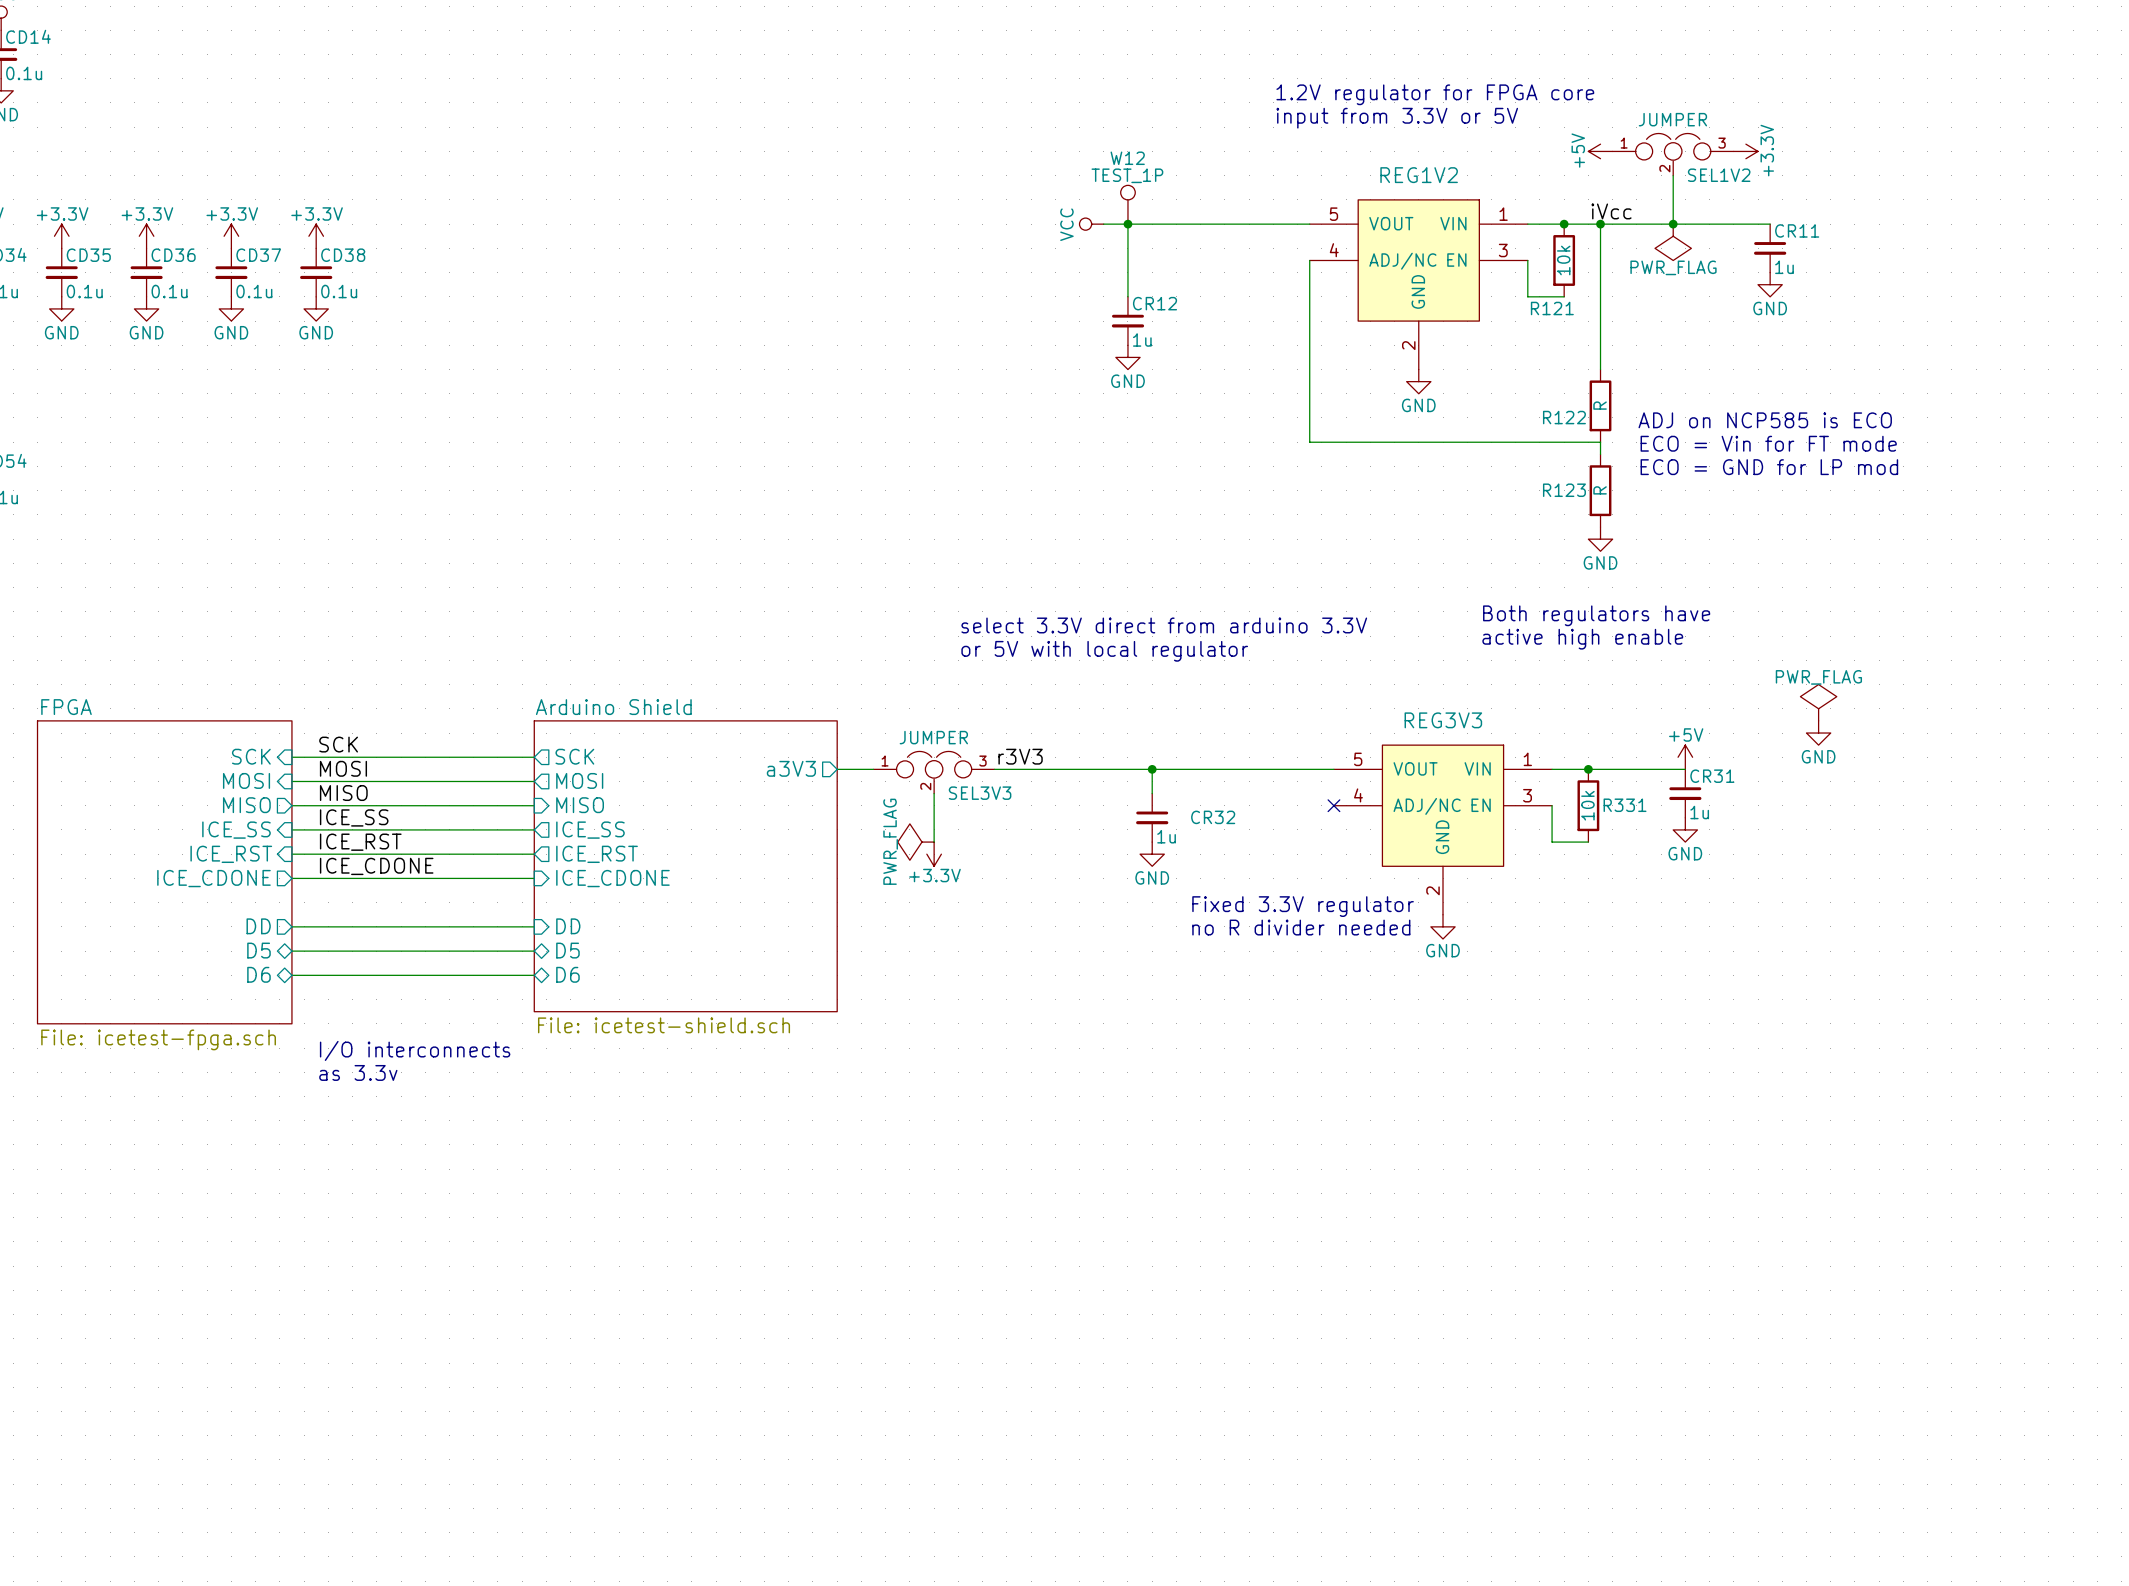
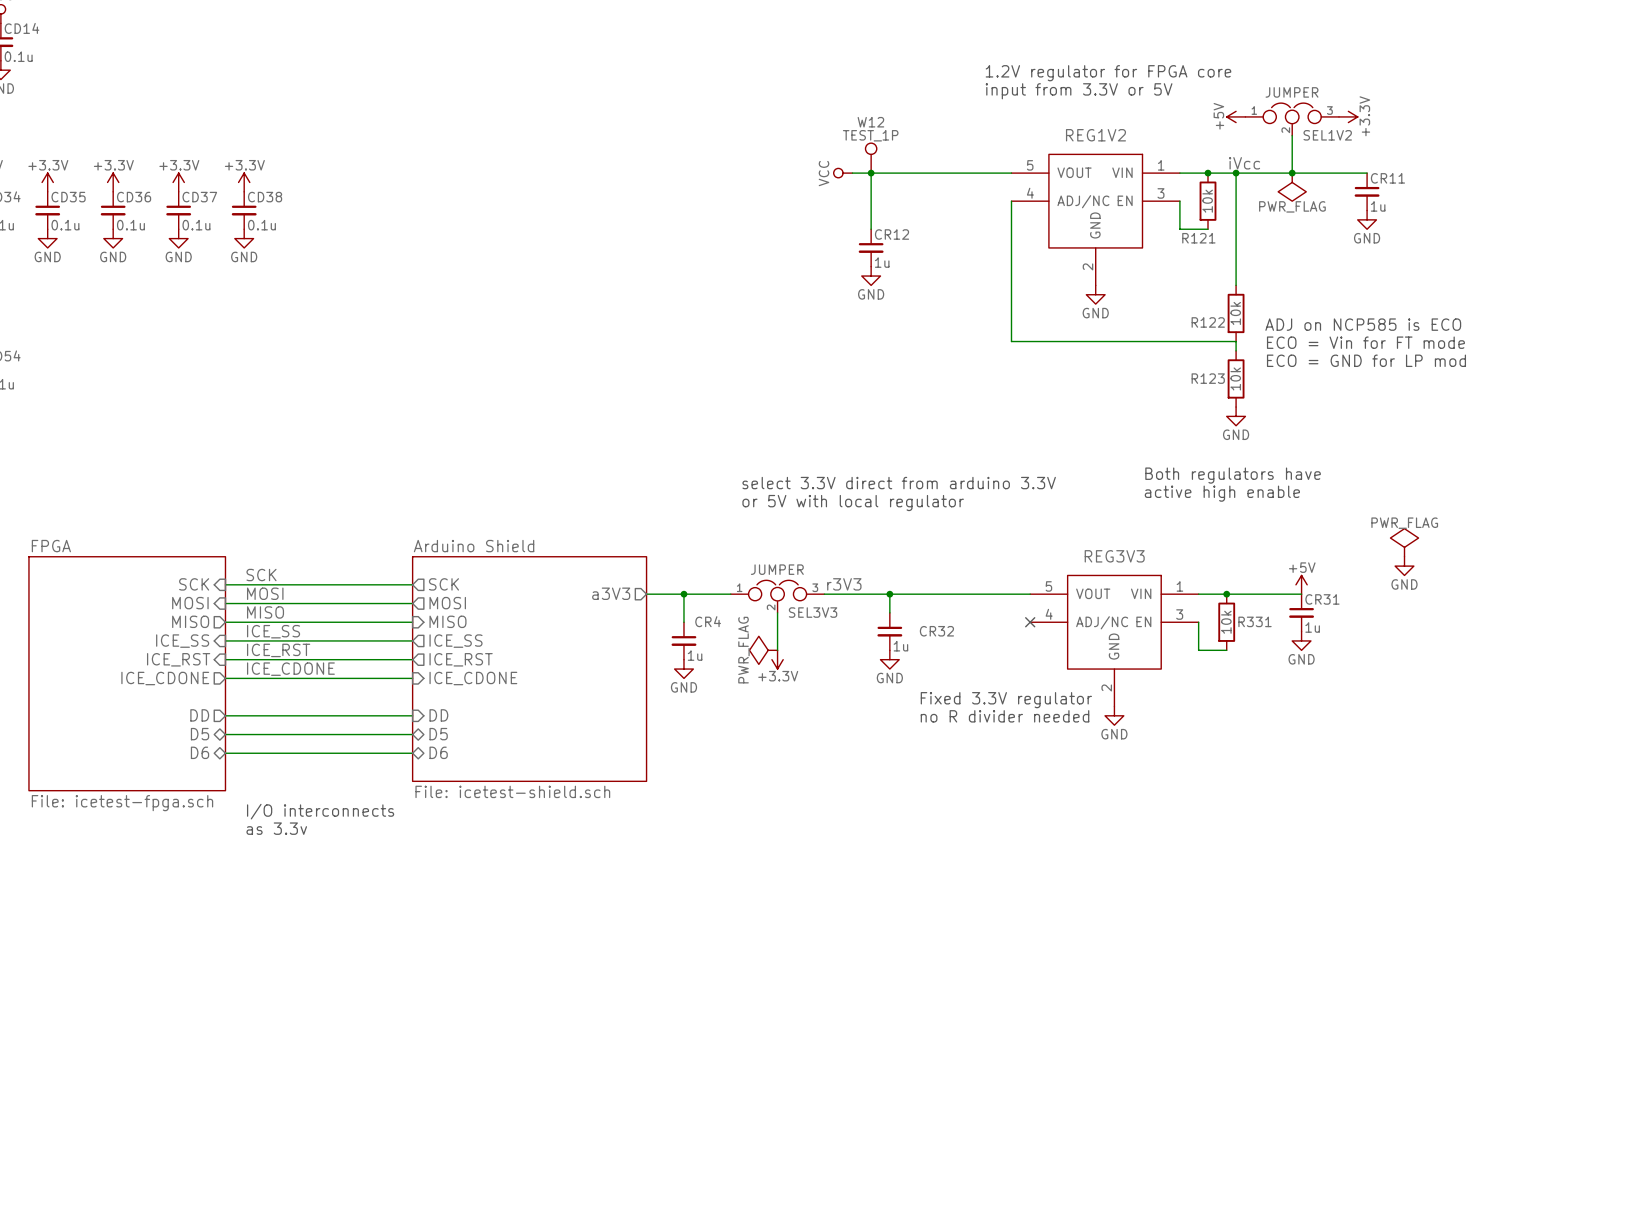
R122 value: R (1600, 405) -> 10k (1235, 313)
R123 value: R (1600, 490) -> 10k (1235, 378)
label position: r3V3 (1020, 756) -> r3V3 (844, 584)
wire: none -> (683, 594) (683, 622)
junction: none -> (683, 594)
wire: (994, 769) (1067, 769) -> (674, 594) (730, 594)
SEL3V3 position: (934, 772) -> (777, 596)
wire: (934, 793) (934, 842) -> (777, 612) (777, 650)
CR4: none -> 1u (683, 640)
power symbol position: PWR_FLAG (915, 842) -> PWR_FLAG (763, 650)
power symbol position: +3.3V (934, 854) -> +3.3V (777, 659)
power symbol: none -> GND (683, 669)

